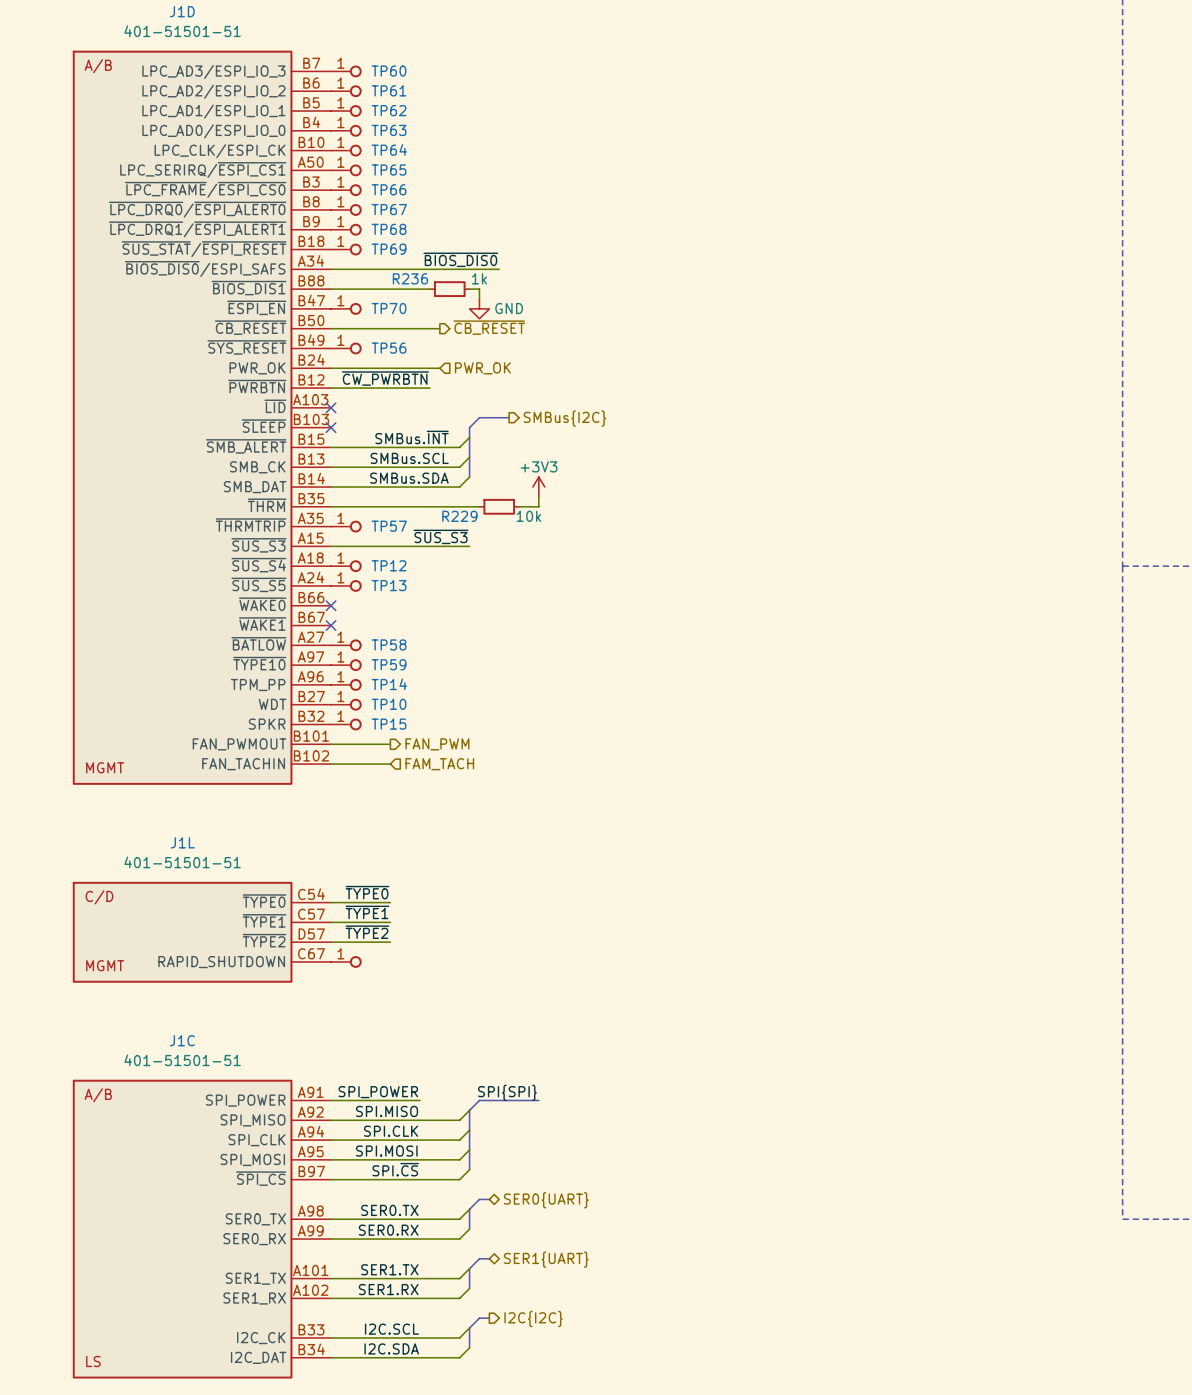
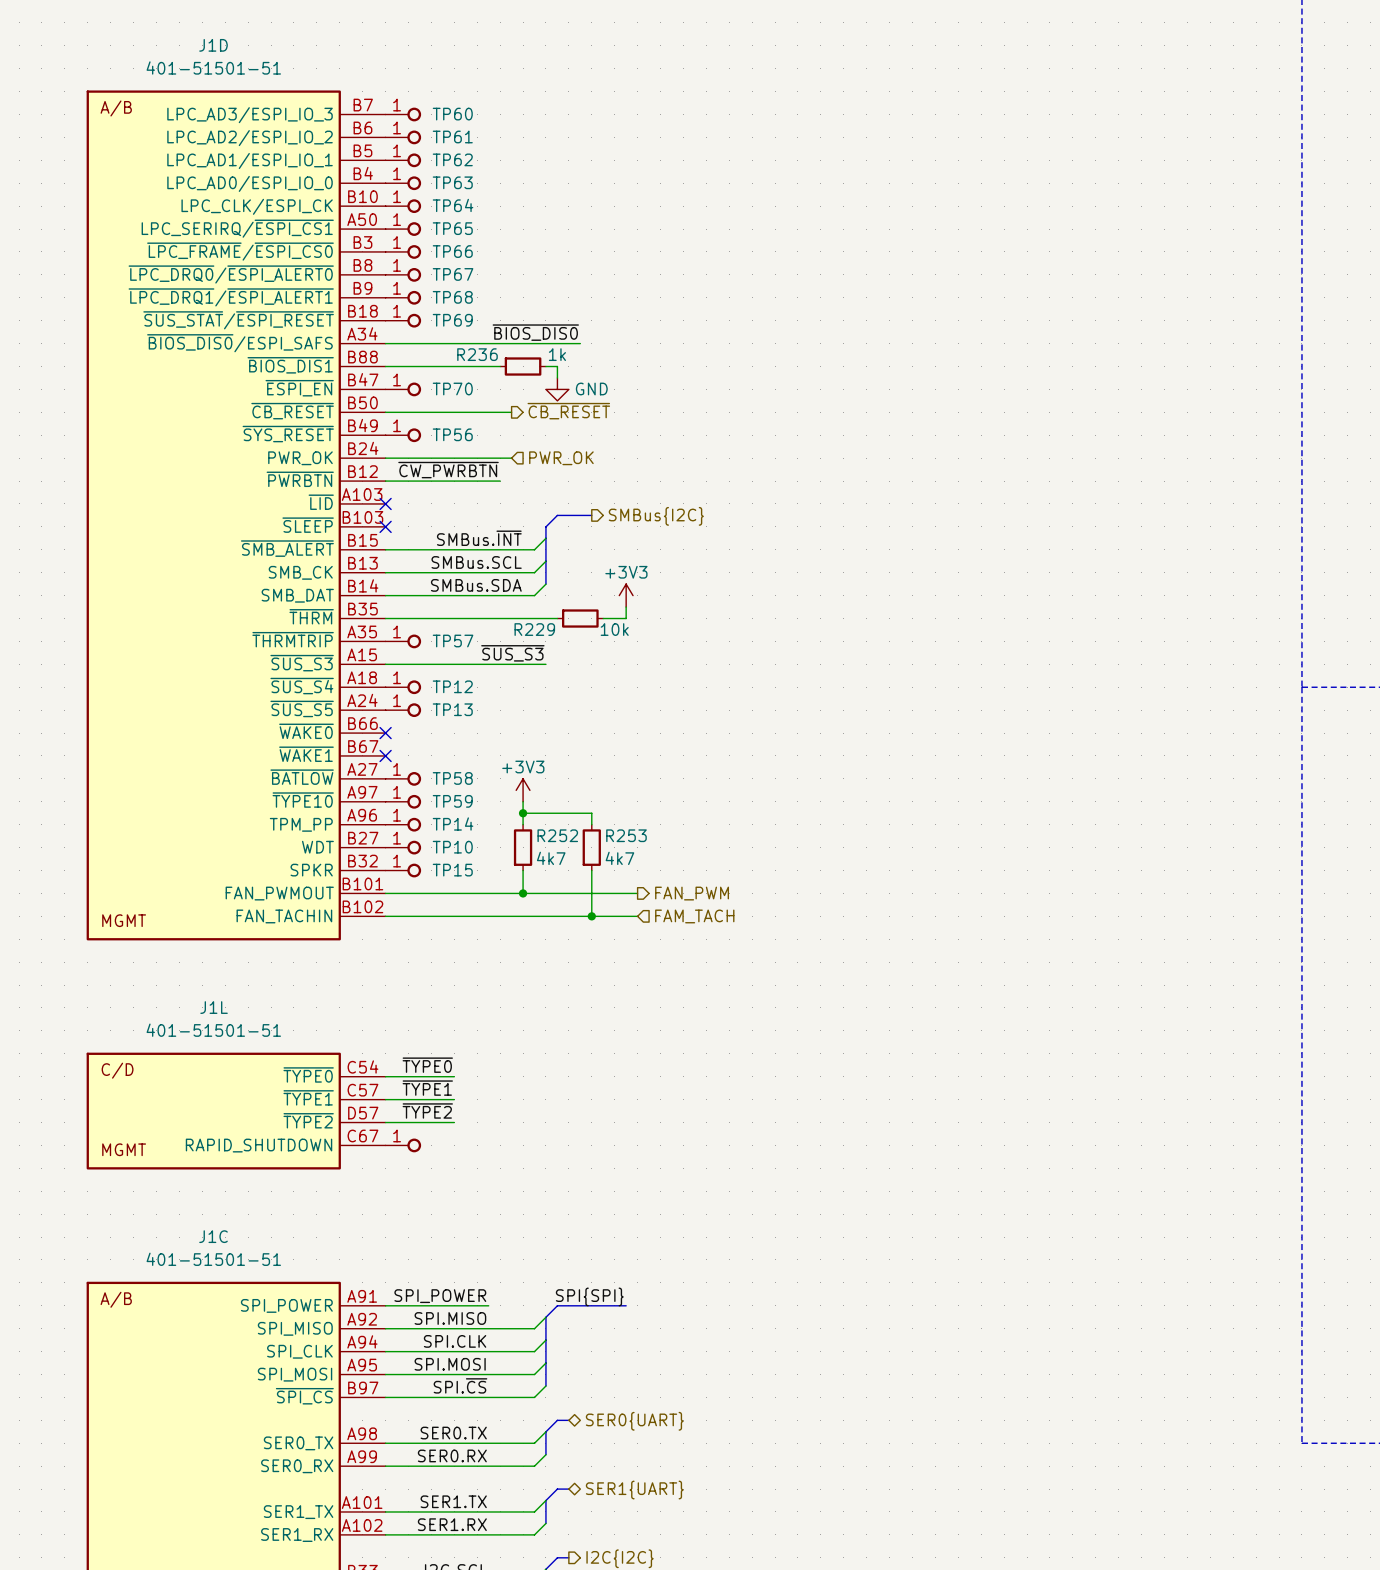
power symbol: none -> +3V3 (523, 790)
wire: none -> (523, 801) (523, 824)
wire: none -> (523, 813) (591, 813) (591, 824)
junction: none -> (523, 813)
R252: none -> (523, 847)
R253: none -> (591, 847)
wire: none -> (523, 870) (523, 893)
wire: none -> (591, 870) (591, 916)
wire: none -> (454, 893) (637, 893)
hierarchical label position: FAN_PWM (437, 744) -> FAN_PWM (692, 893)
junction: none -> (523, 893)
wire: none -> (454, 916) (637, 916)
hierarchical label position: FAM_TACH (439, 764) -> FAM_TACH (694, 916)
junction: none -> (591, 916)

